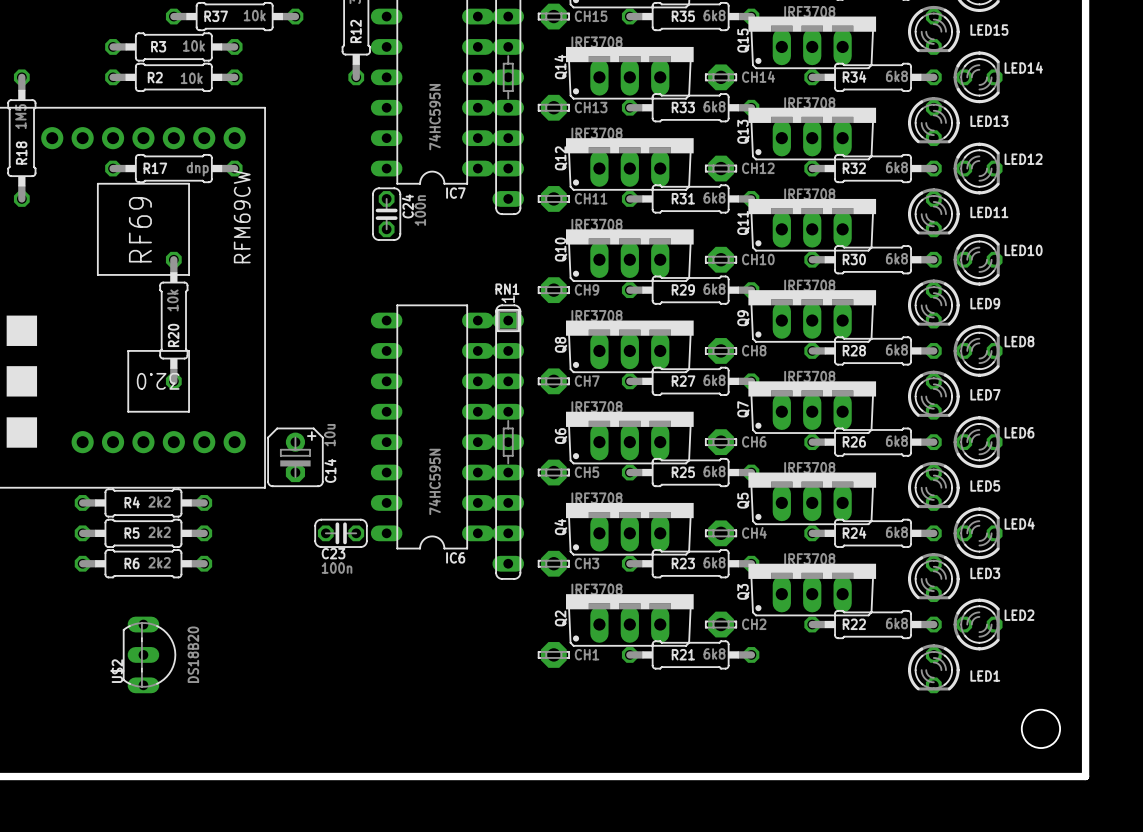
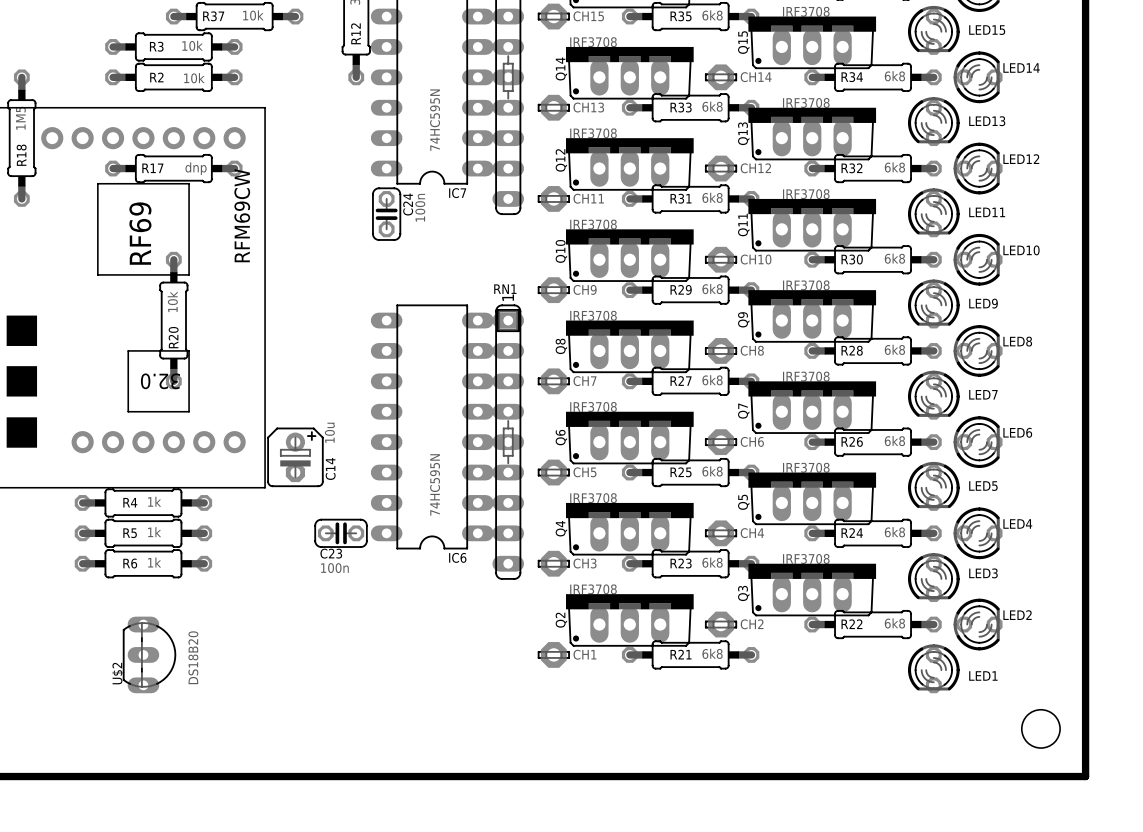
R4 value: 2k2 (159, 501) -> 1k (154, 501)
R5 value: 2k2 (159, 532) -> 1k (154, 532)
R6 value: 2k2 (159, 562) -> 1k (154, 562)

